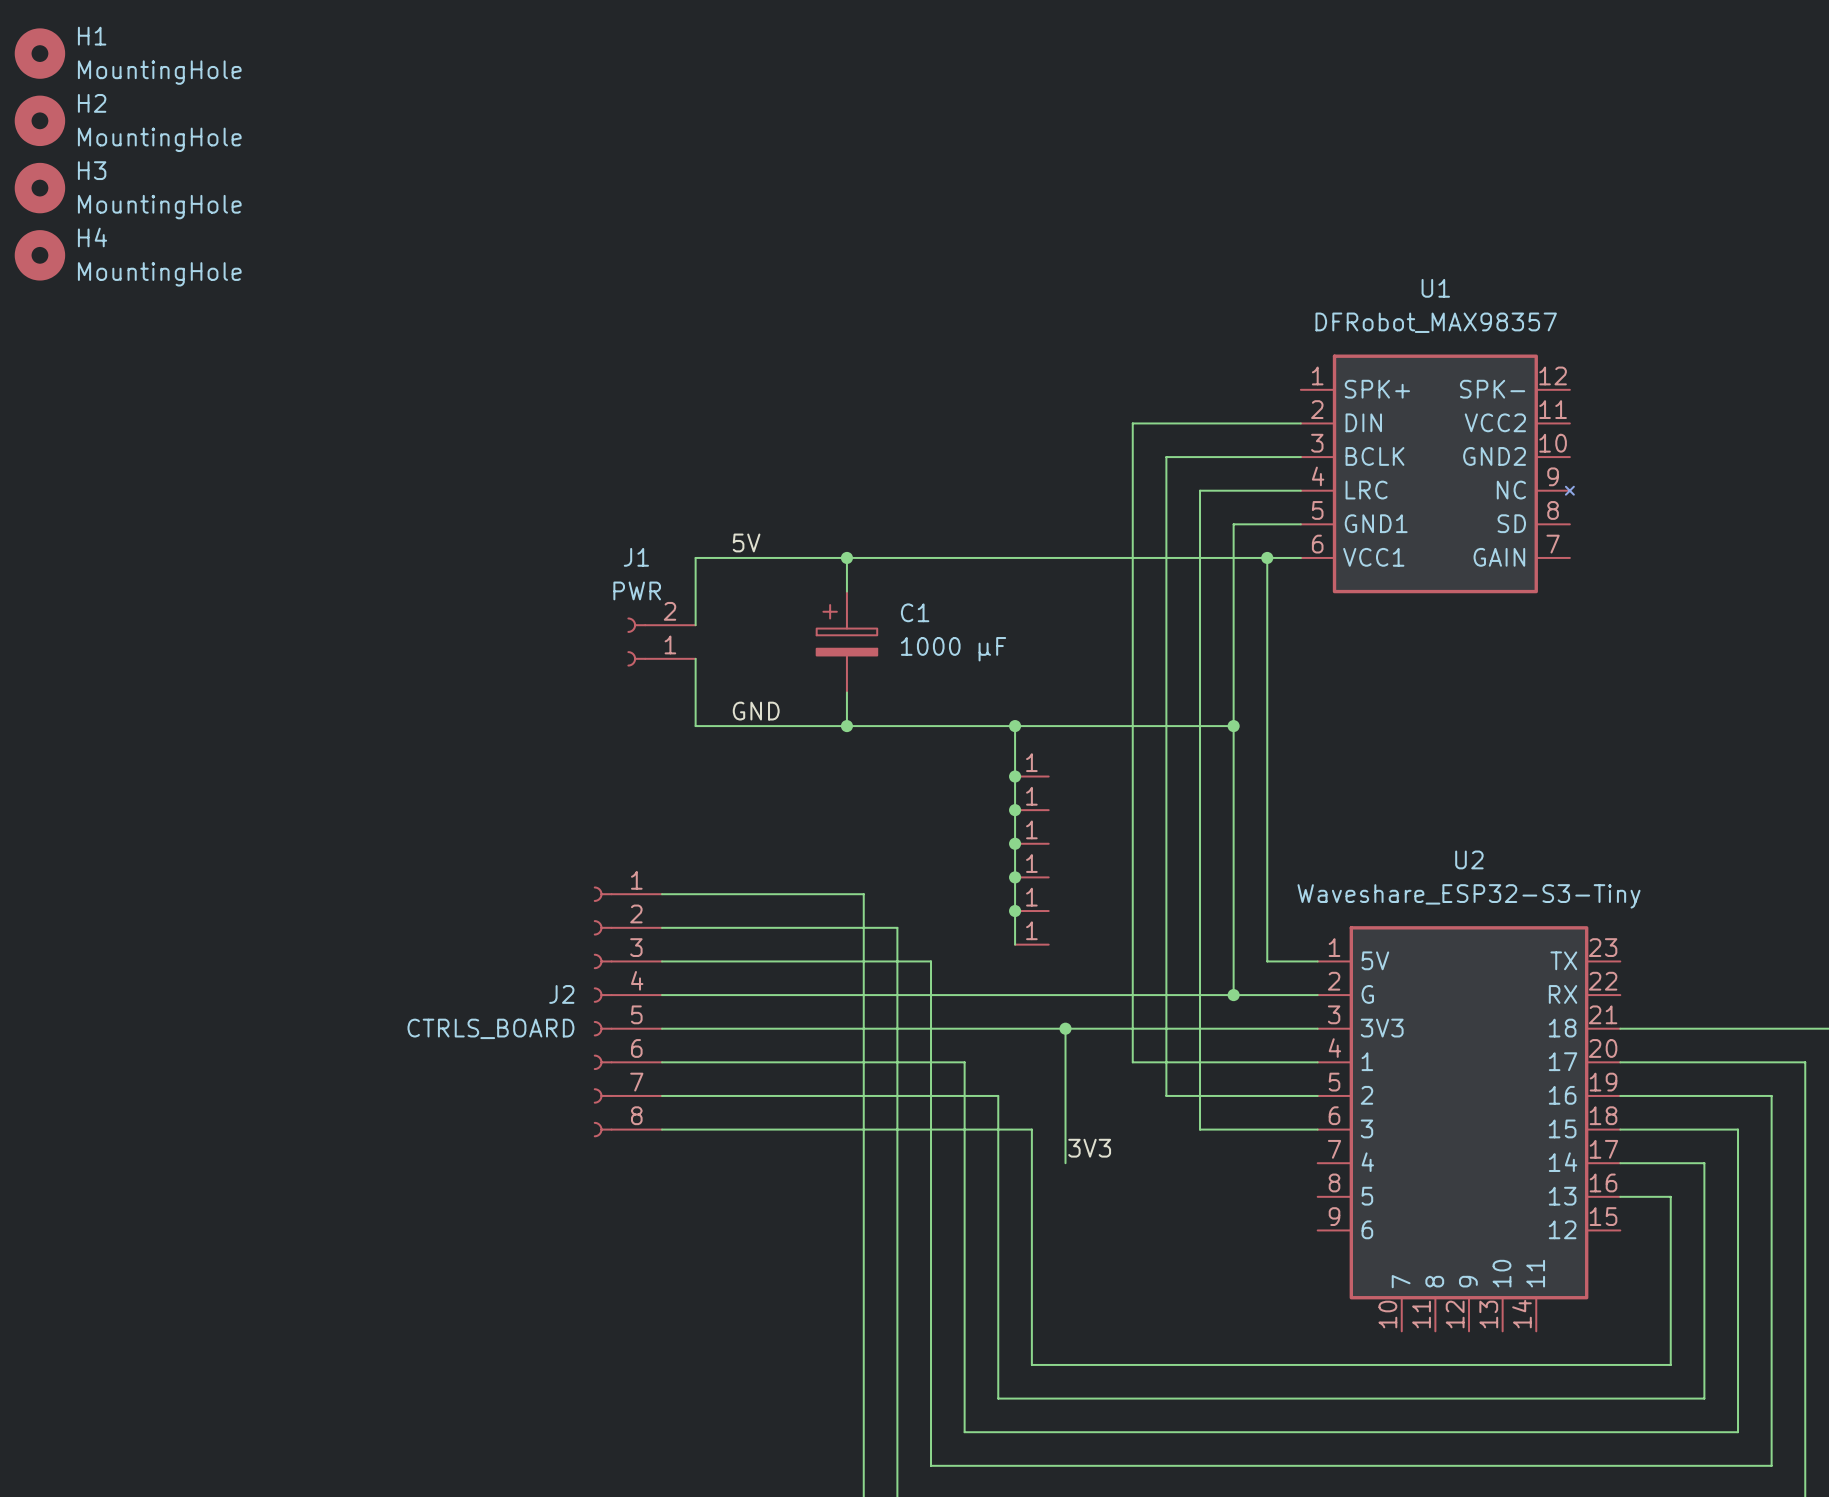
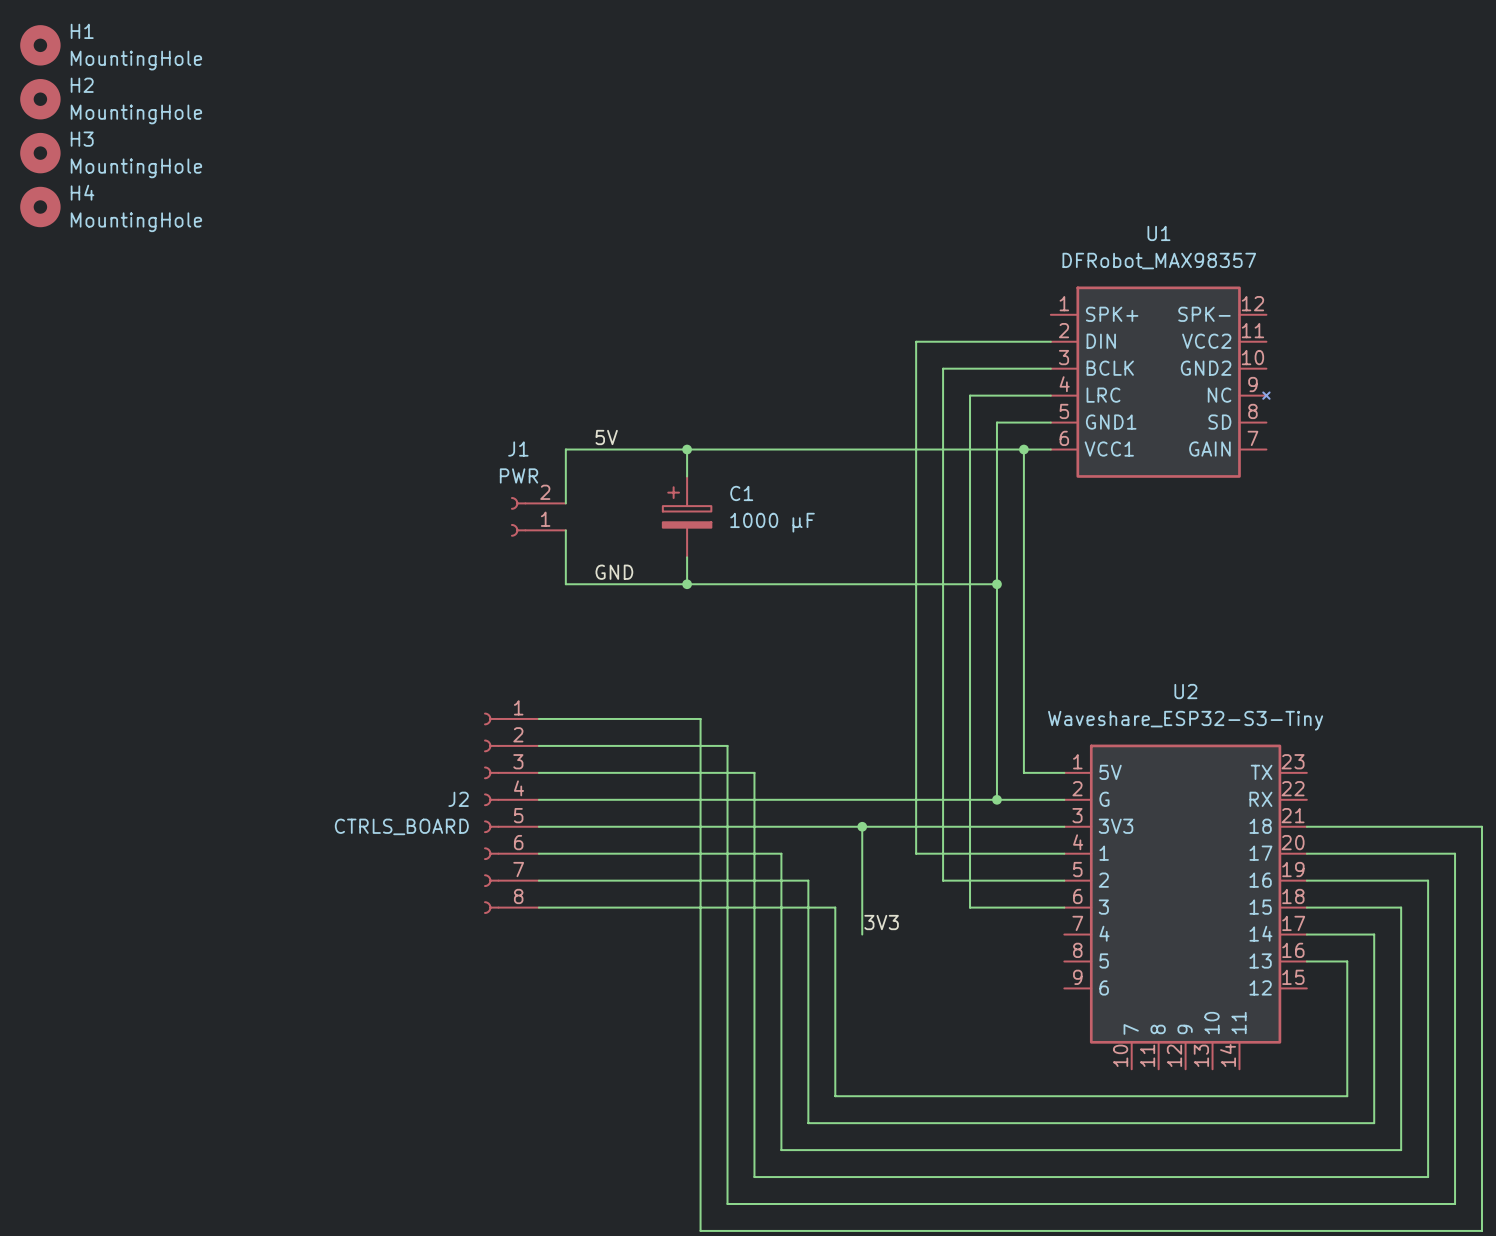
wire: (1015, 726) (1015, 944) -> none
junction: (1015, 726) -> none
junction: (1015, 776) -> none
part: (1031, 776) -> none
junction: (1015, 810) -> none
part: (1031, 810) -> none
junction: (1015, 843) -> none
part: (1031, 843) -> none
junction: (1015, 877) -> none
part: (1031, 877) -> none
junction: (1015, 911) -> none
part: (1031, 911) -> none
part: (1031, 944) -> none

